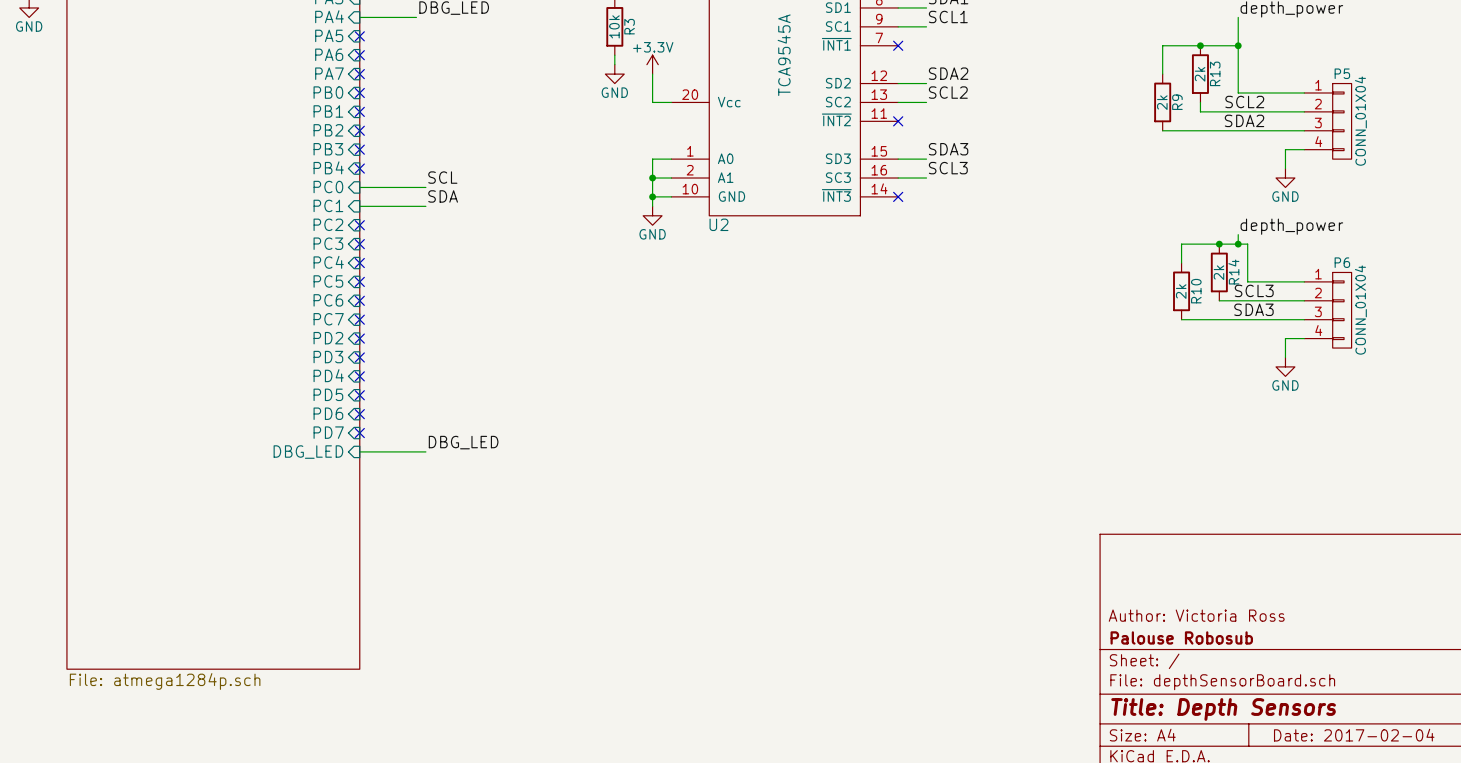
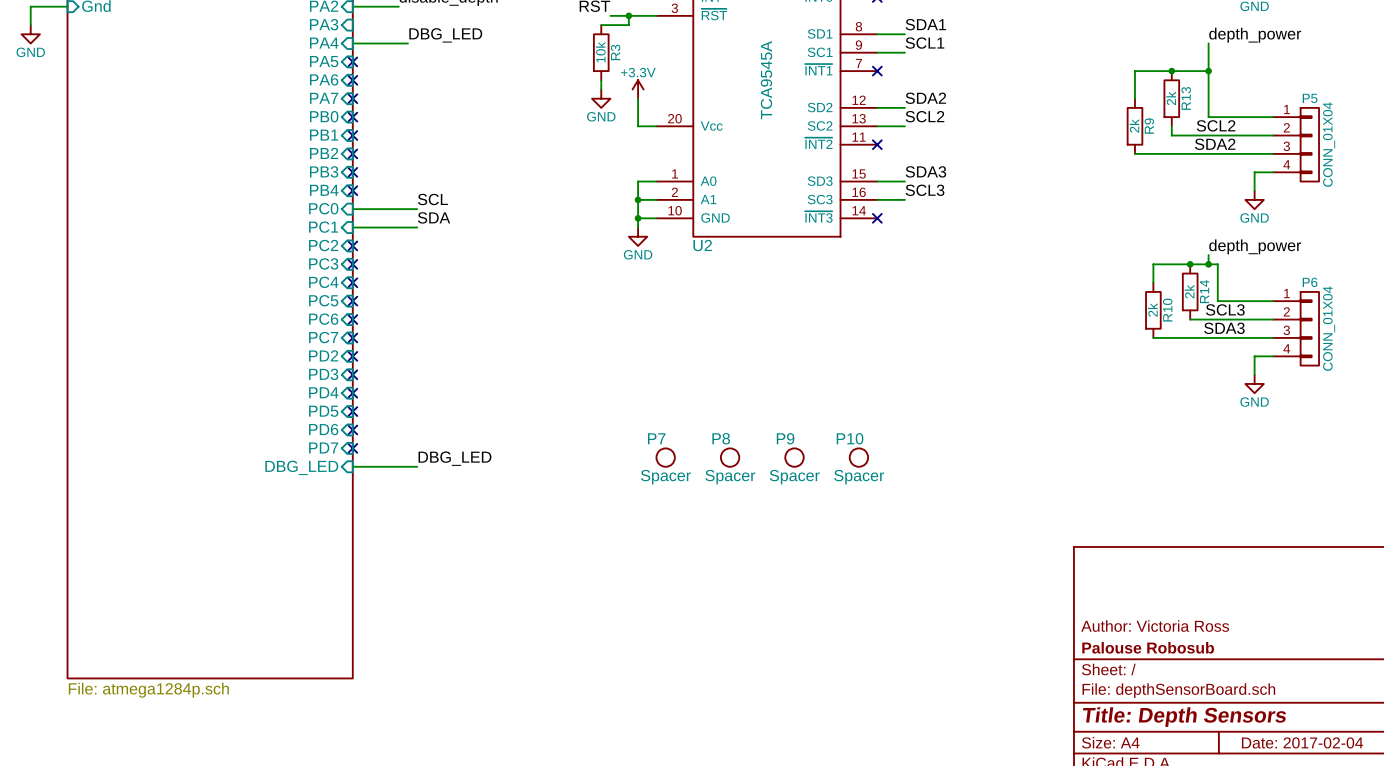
P7: none -> Spacer (665, 457)
P8: none -> Spacer (730, 457)
P9: none -> Spacer (794, 457)
P10: none -> Spacer (858, 457)

